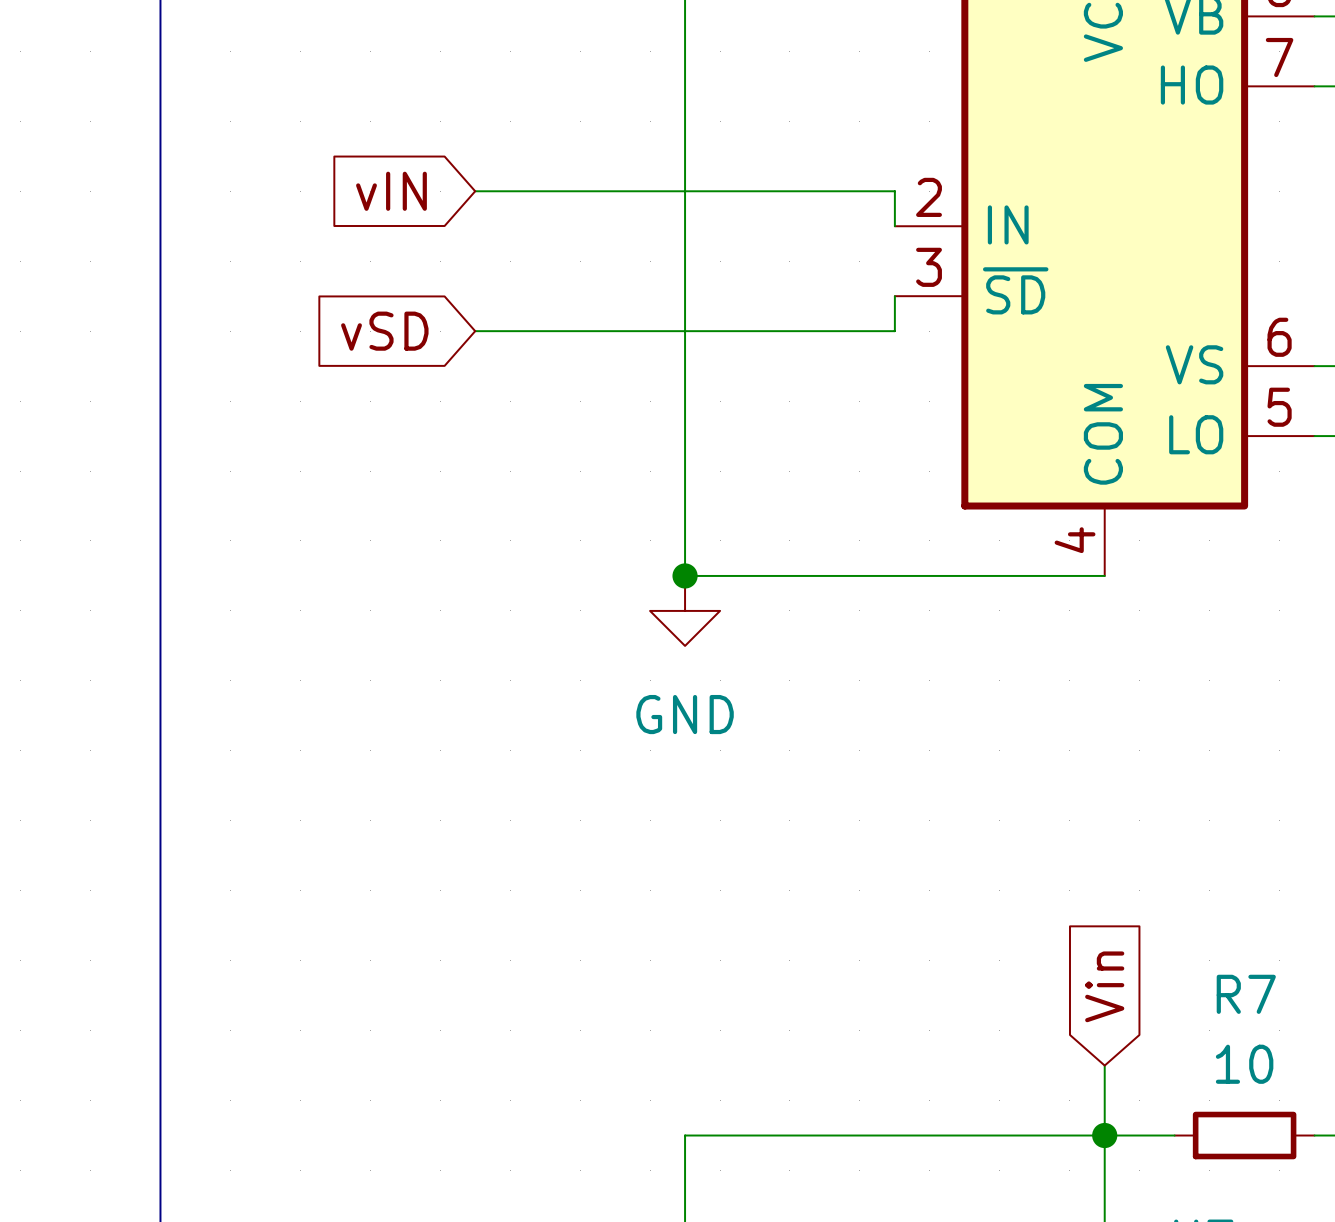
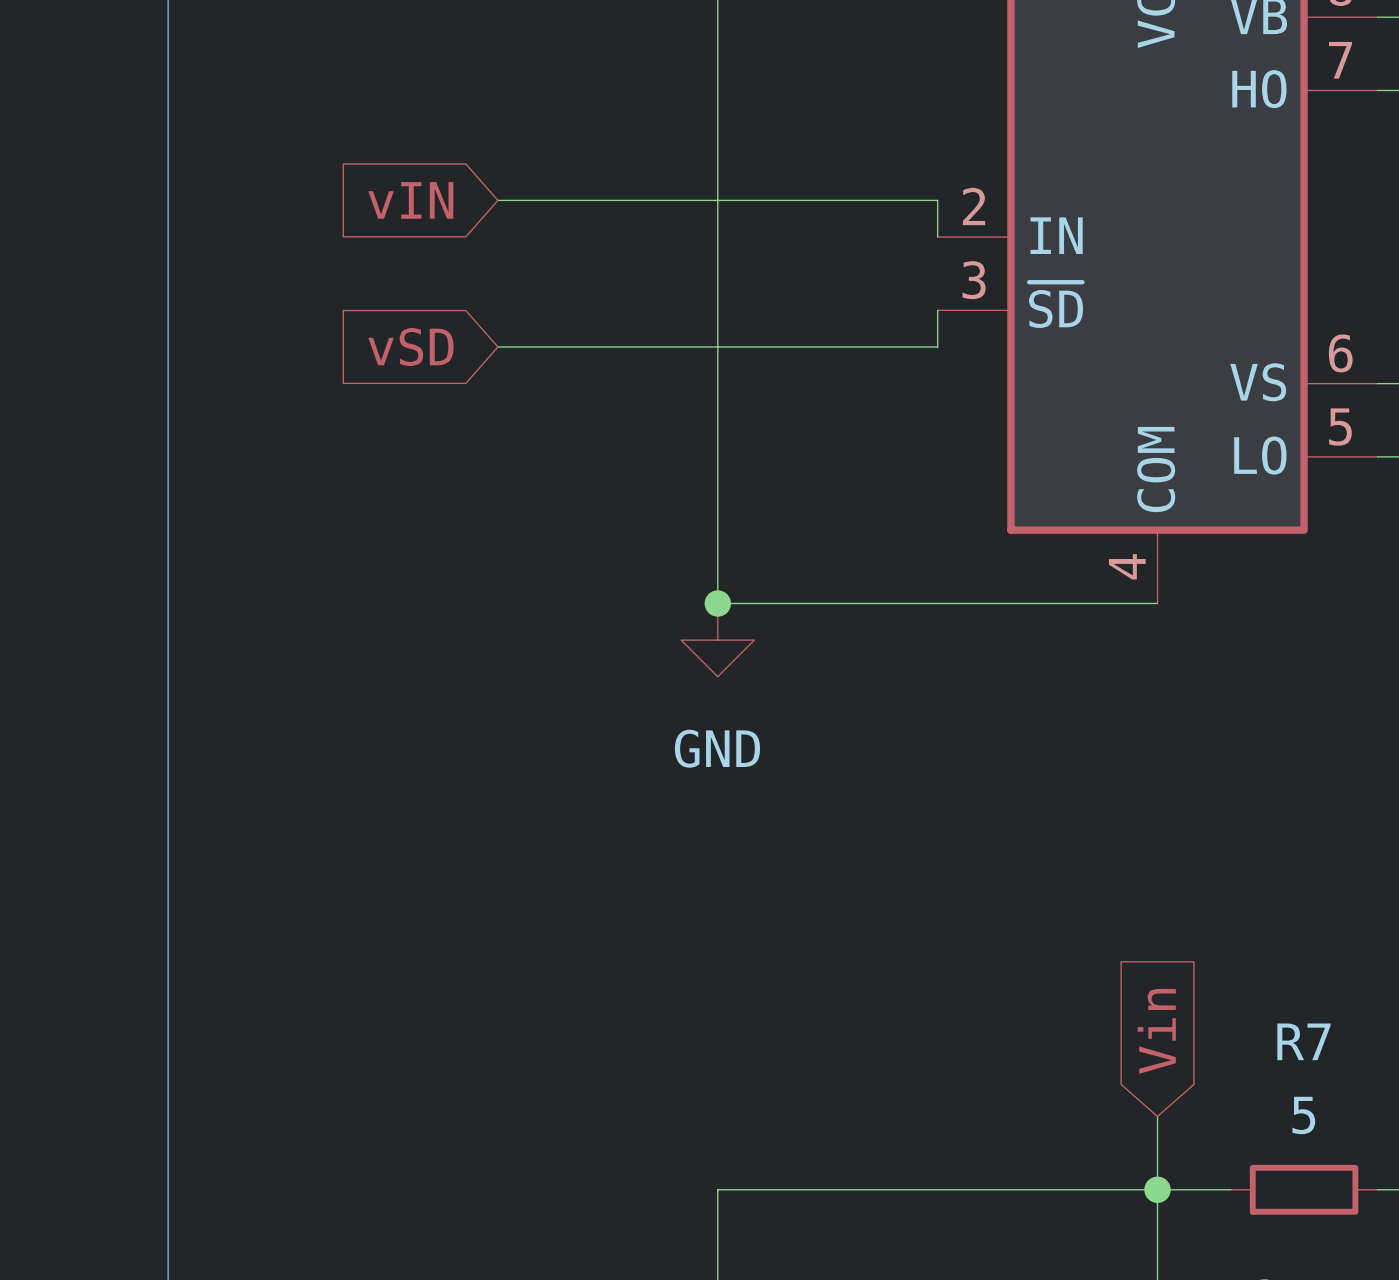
R7 value: 10 (1244, 1064) -> 5 (1303, 1115)

